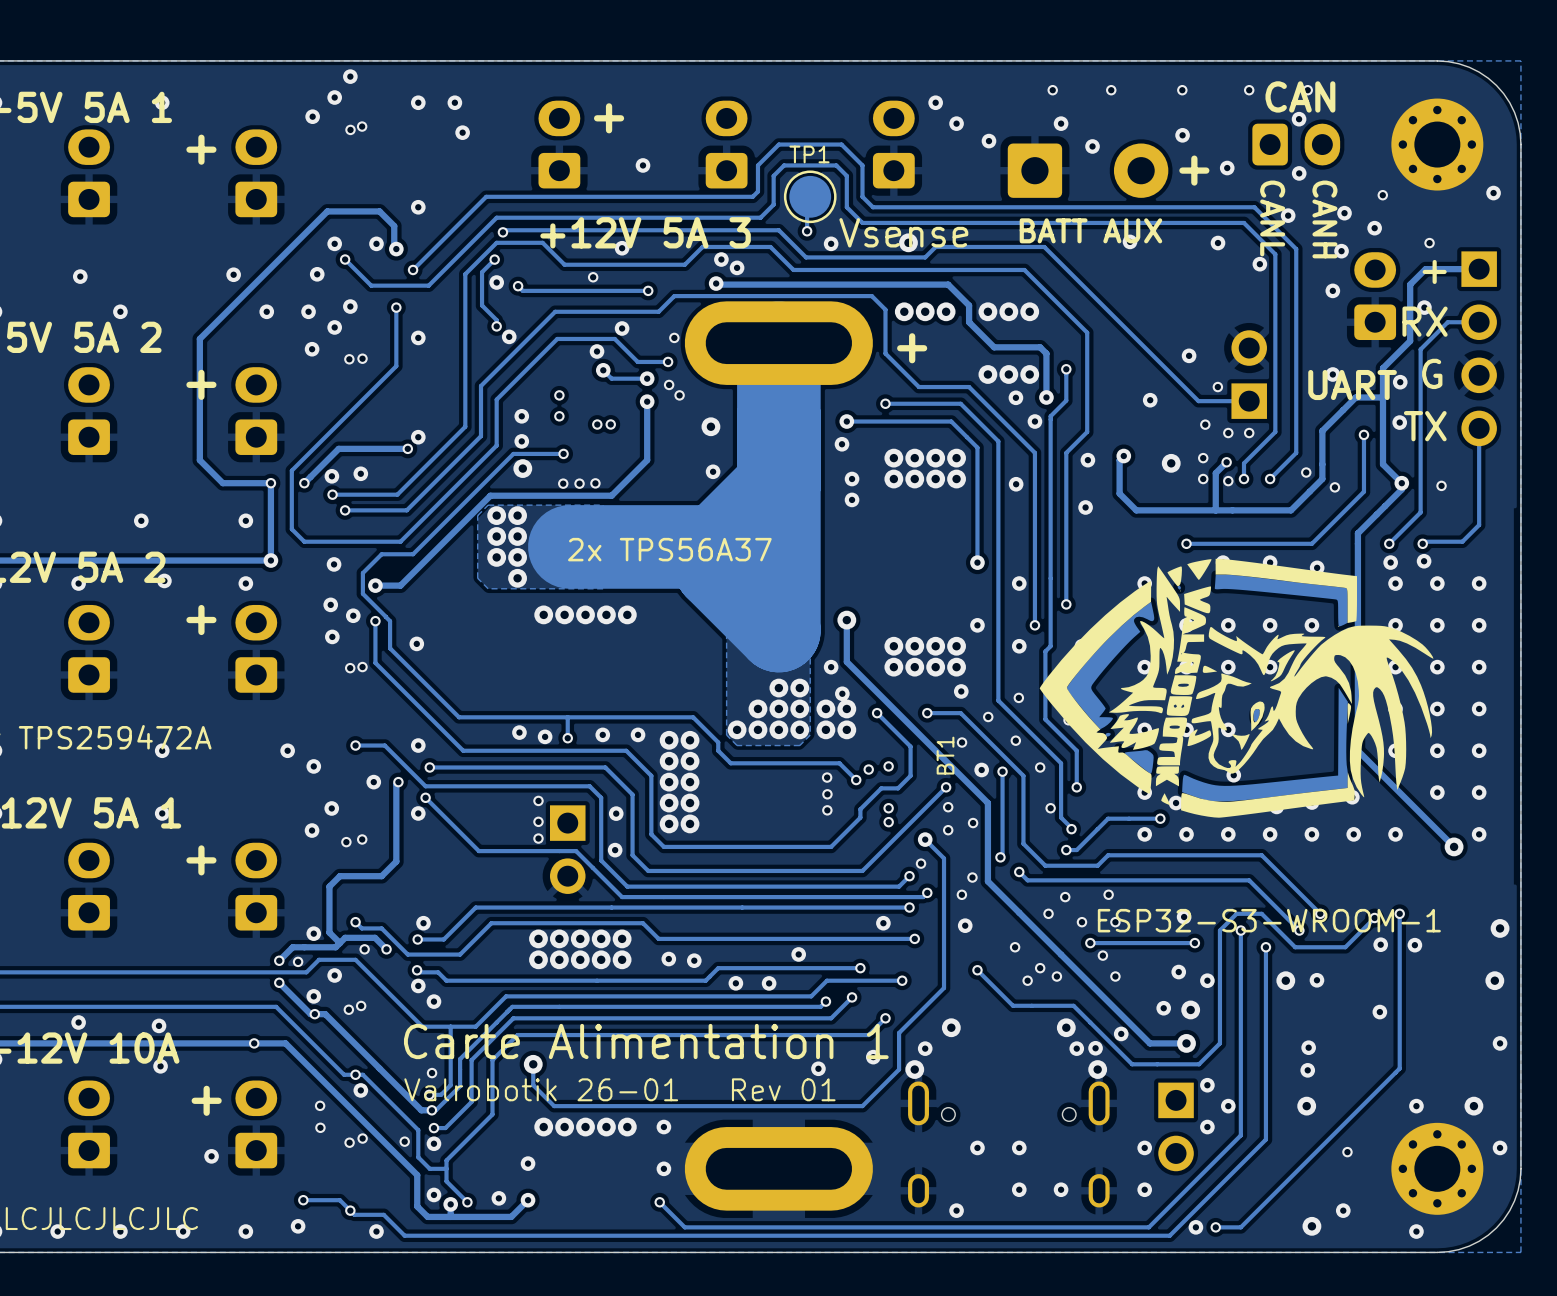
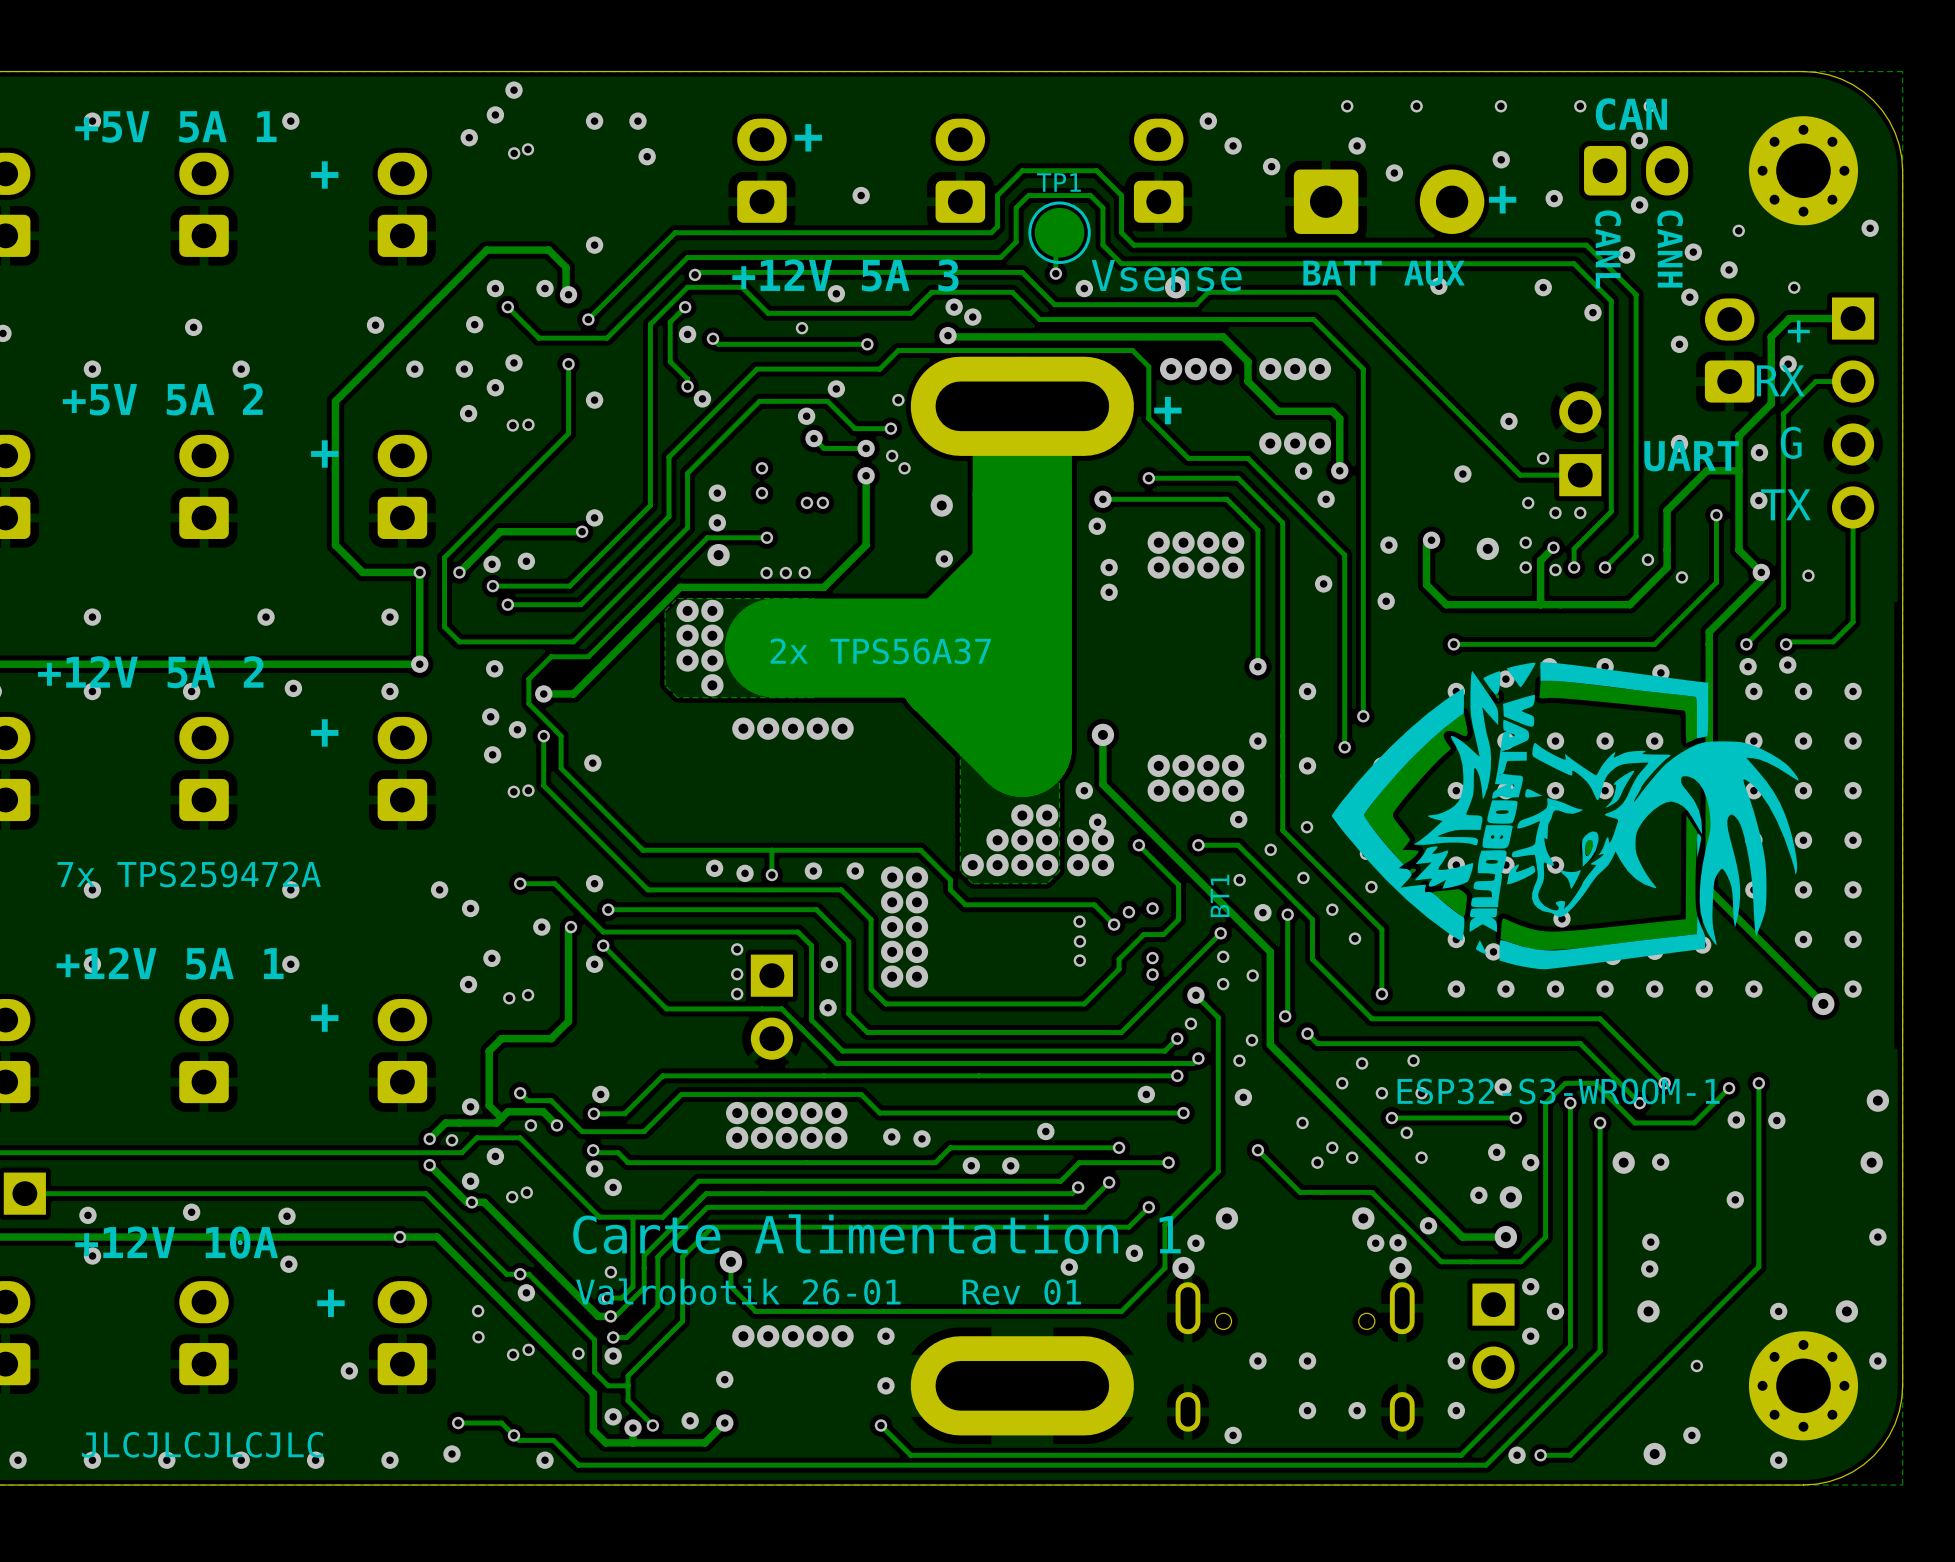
track: (1066, 311) (1087, 332) (1087, 431) (1066, 452) -> (1363, 369) (1363, 437)
via: (1066, 369) -> none
track: (1066, 400) (1050, 416) (1050, 468) -> (1363, 474) (1363, 536)
track: (1034, 452) (1034, 625) -> (1326, 536) (1344, 555)
via position: (1016, 484) -> (1323, 583)
track: none -> (1505, 644) (1453, 644)
via position: (1186, 543) -> (1453, 644)
via: none -> (1505, 679)
via position: (1034, 625) -> (1344, 747)
track: (1050, 630) (1050, 646) (1045, 651) (1045, 719) (1076, 750) (1076, 787) -> none
via: none -> (1371, 887)
track: (1061, 763) (1061, 817) (1071, 829) -> (1357, 904) (1381, 929) (1381, 994)
via: (1076, 787) -> none
via: none -> (1355, 938)
via: (1050, 808) -> none
track: (1023, 809) (1023, 843) (1045, 865) (1097, 865) (1108, 855) (1261, 855) (1265, 859) -> (1312, 959) (1372, 1018) (1600, 1018)
track: (1160, 818) (1108, 818) (1076, 850) (1066, 850) -> none
via: (1160, 818) -> none
via position: (1071, 829) -> (1381, 994)
via: (1066, 850) -> none

